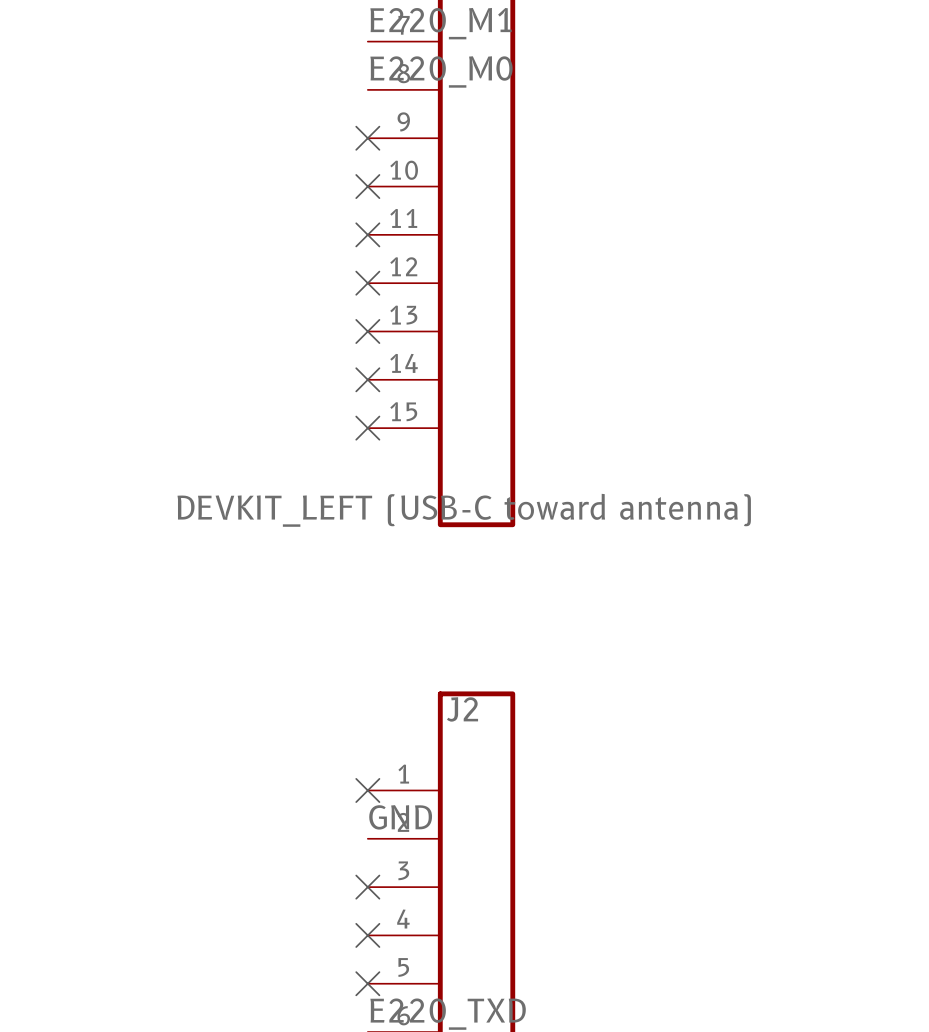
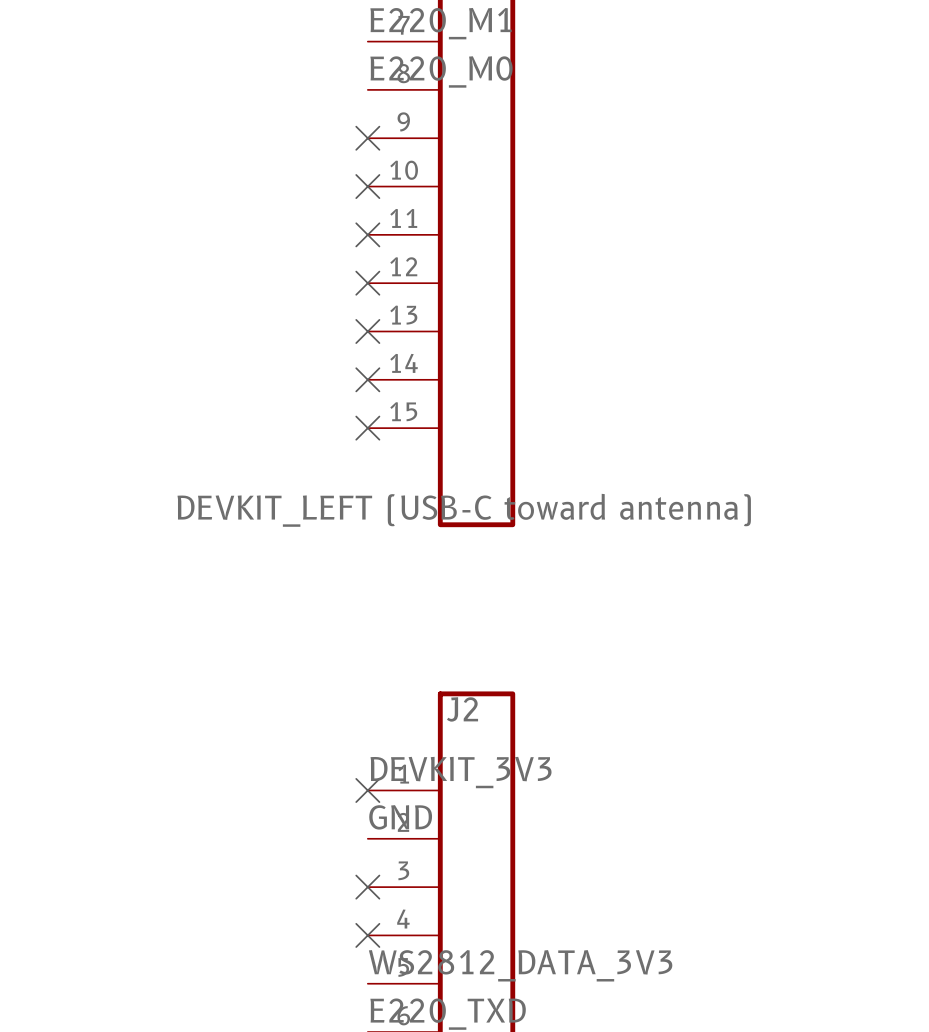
label: none -> DEVKIT_3V3 (461, 772)
label: none -> WS2812_DATA_3V3 (520, 965)
no-connect mark: (367, 983) -> none

